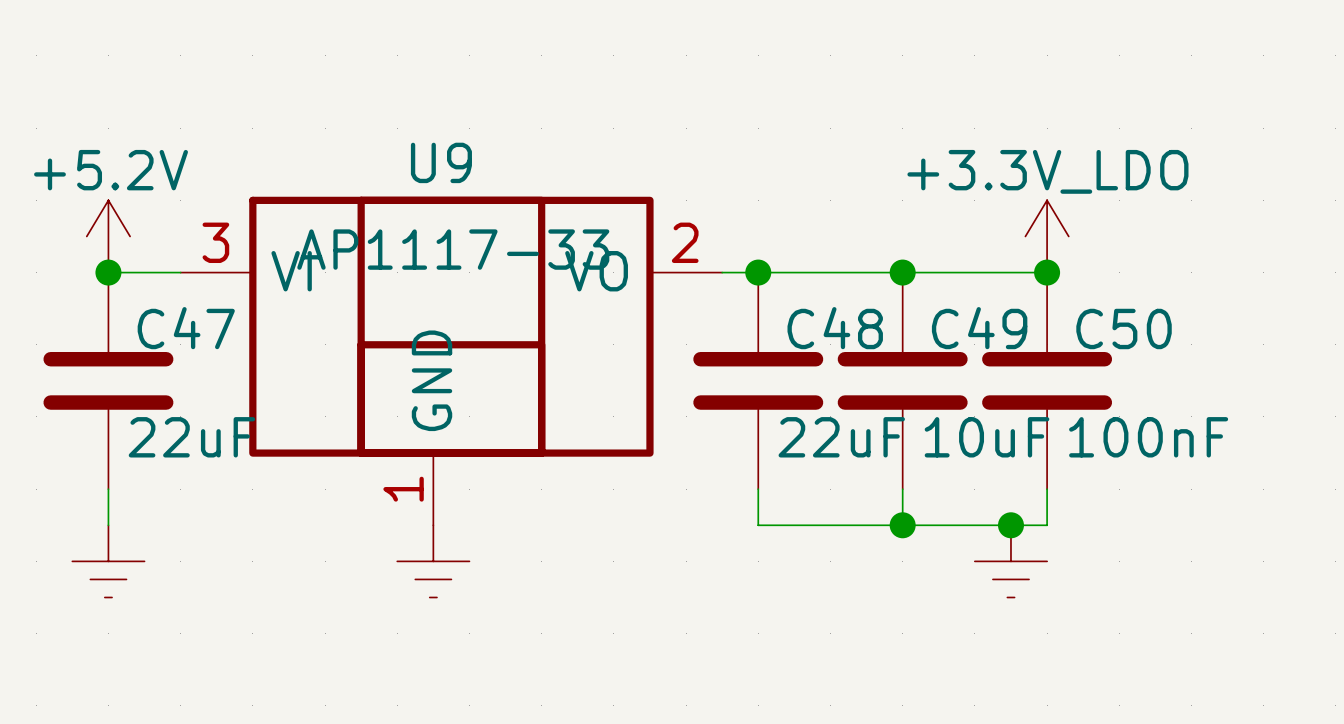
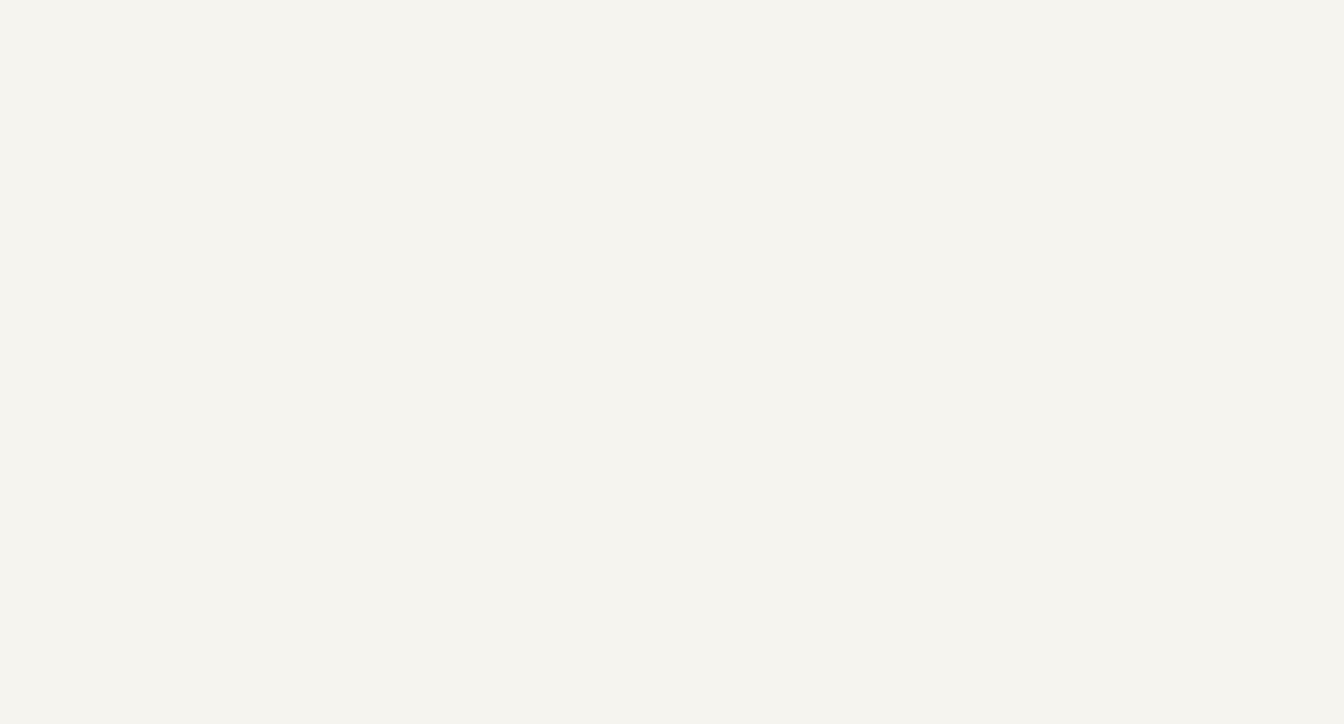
power symbol: +5.2V (108, 236) -> none
power symbol: +3.3V_LDO (1047, 236) -> none
wire: (108, 272) (180, 272) -> none
junction: (108, 272) -> none
wire: (722, 272) (1047, 272) -> none
junction: (758, 272) -> none
junction: (902, 272) -> none
junction: (1047, 272) -> none
U9: AP1117-33 (451, 361) -> none
C47: 22uF (108, 380) -> none
C48: 22uF (758, 380) -> none
C49: 10uF (902, 380) -> none
C50: 100nF (1047, 380) -> none
wire: (108, 489) (108, 525) -> none
wire: (758, 489) (758, 525) (1047, 525) (1047, 489) -> none
wire: (902, 489) (902, 525) -> none
junction: (902, 525) -> none
junction: (1010, 525) -> none
power symbol: (108, 561) -> none
power symbol: (433, 561) -> none
power symbol: (1010, 561) -> none

